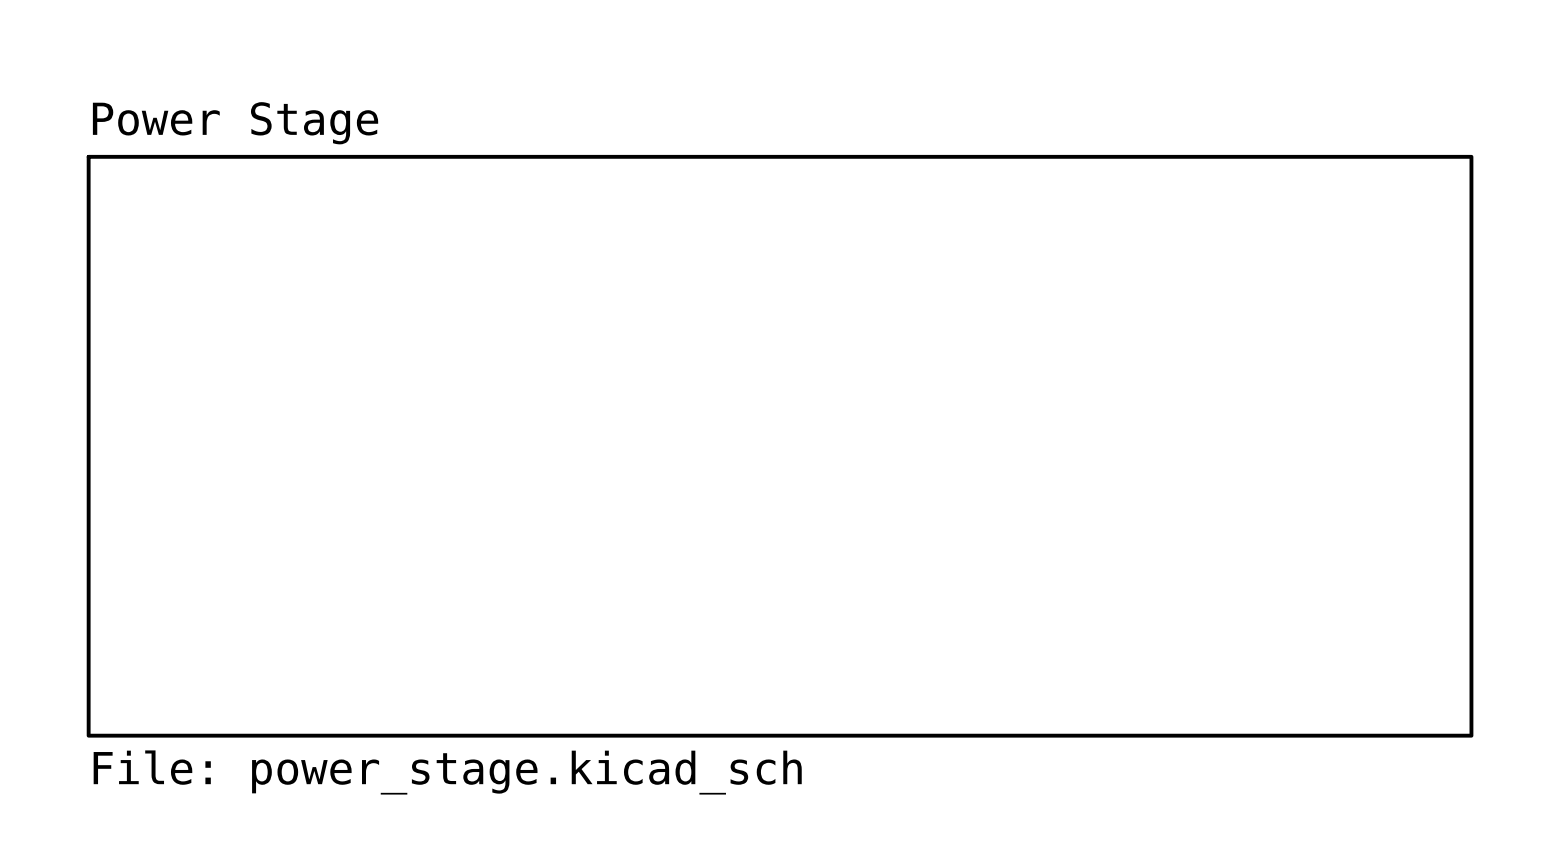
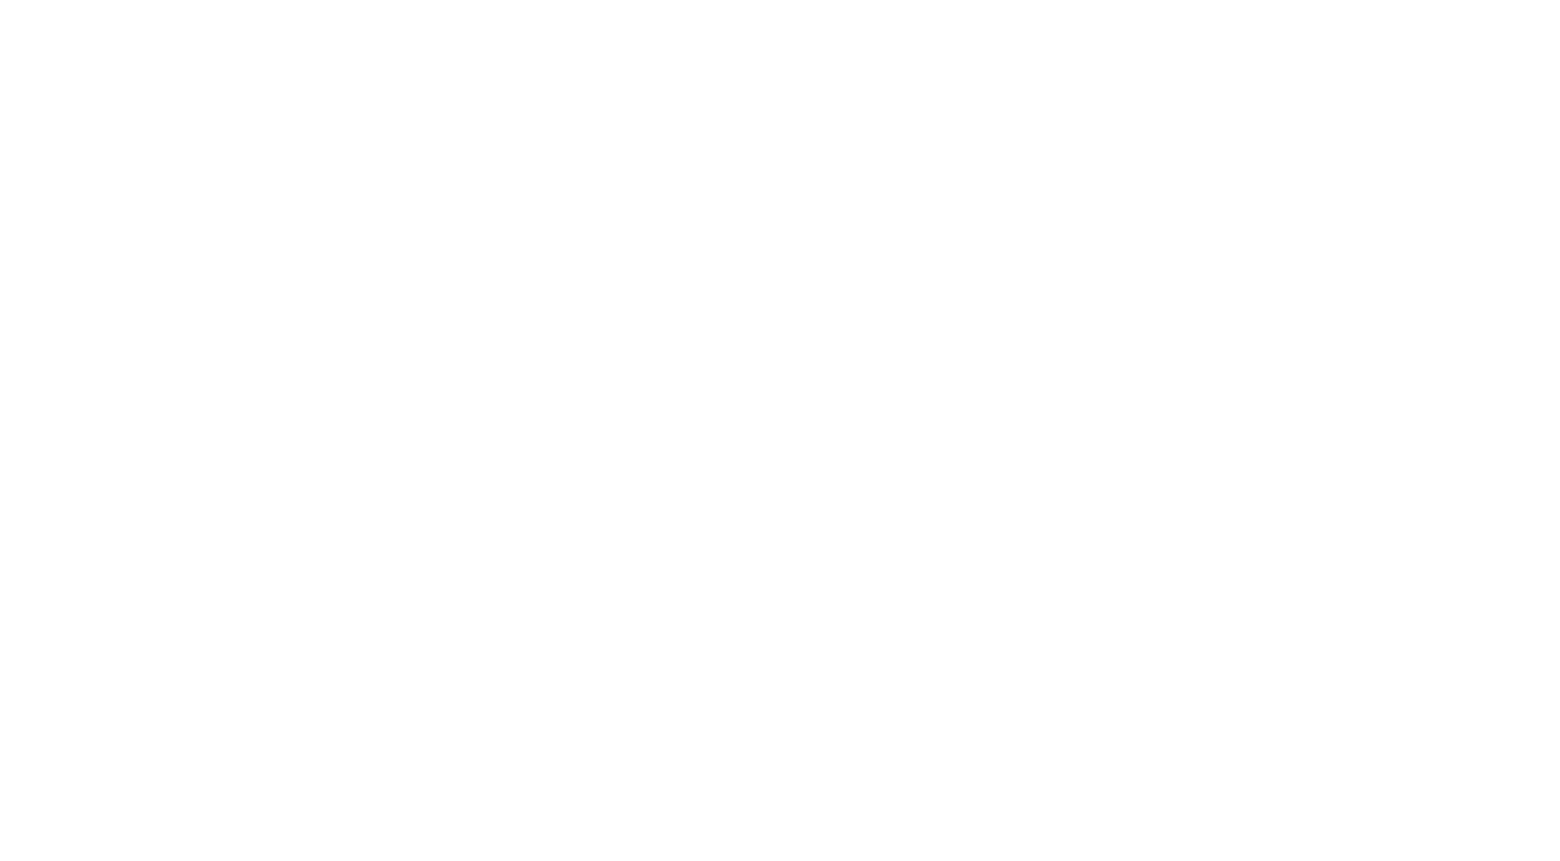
sheet Power Stage: File: power_stage.kicad_sch (780, 446) -> none

